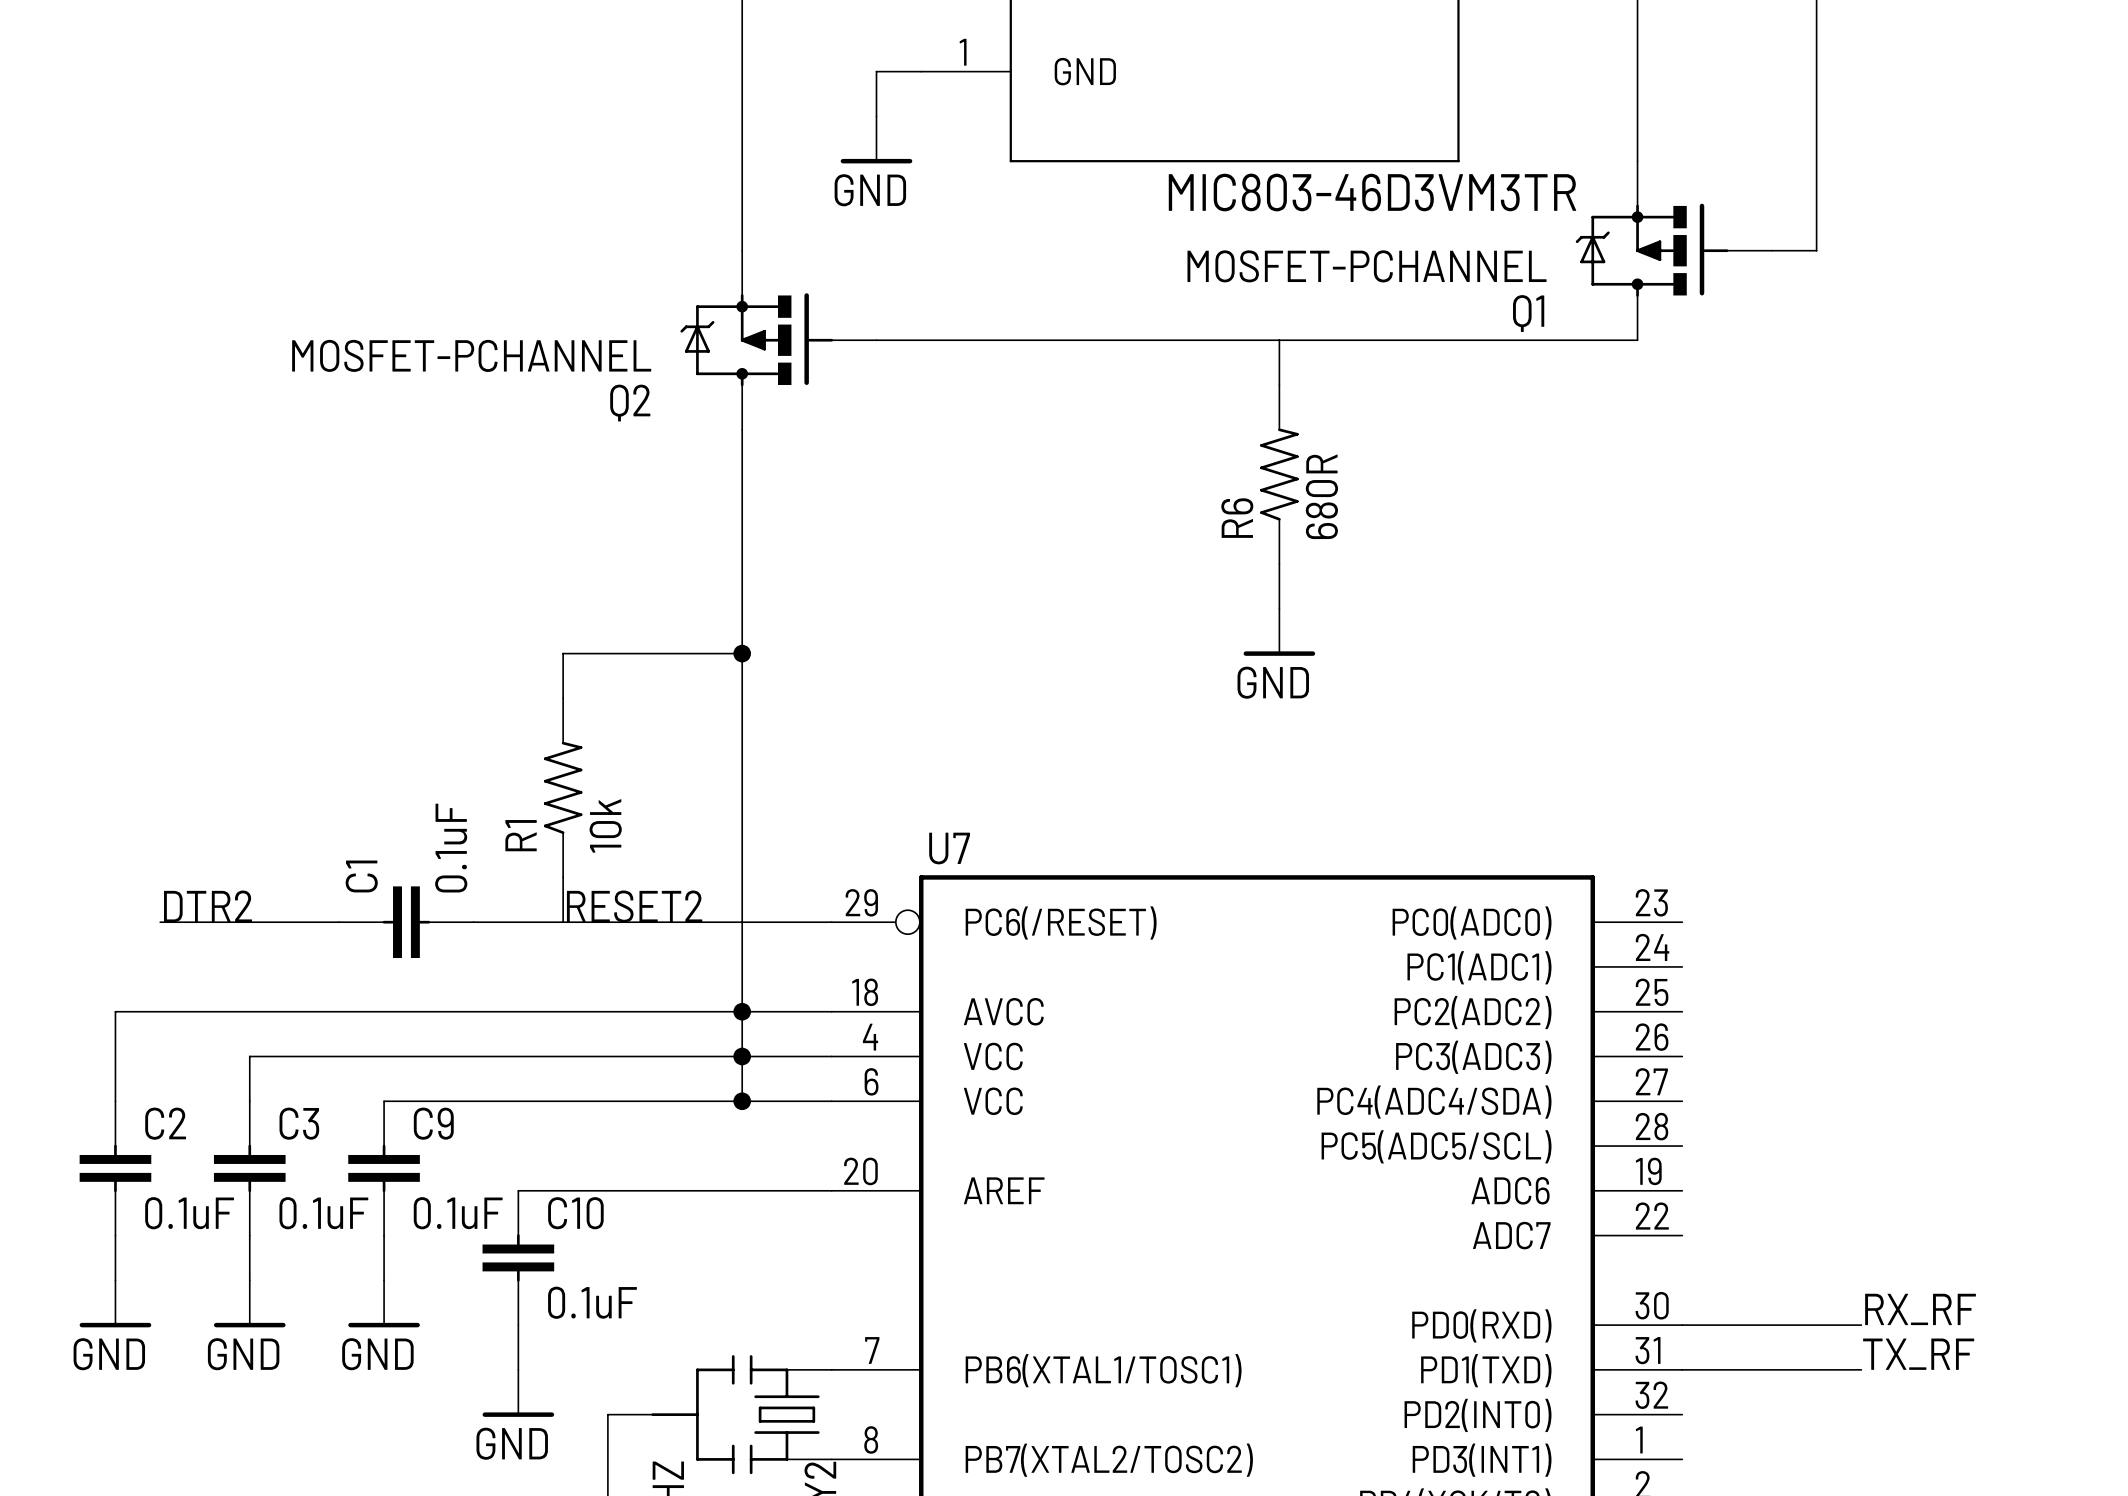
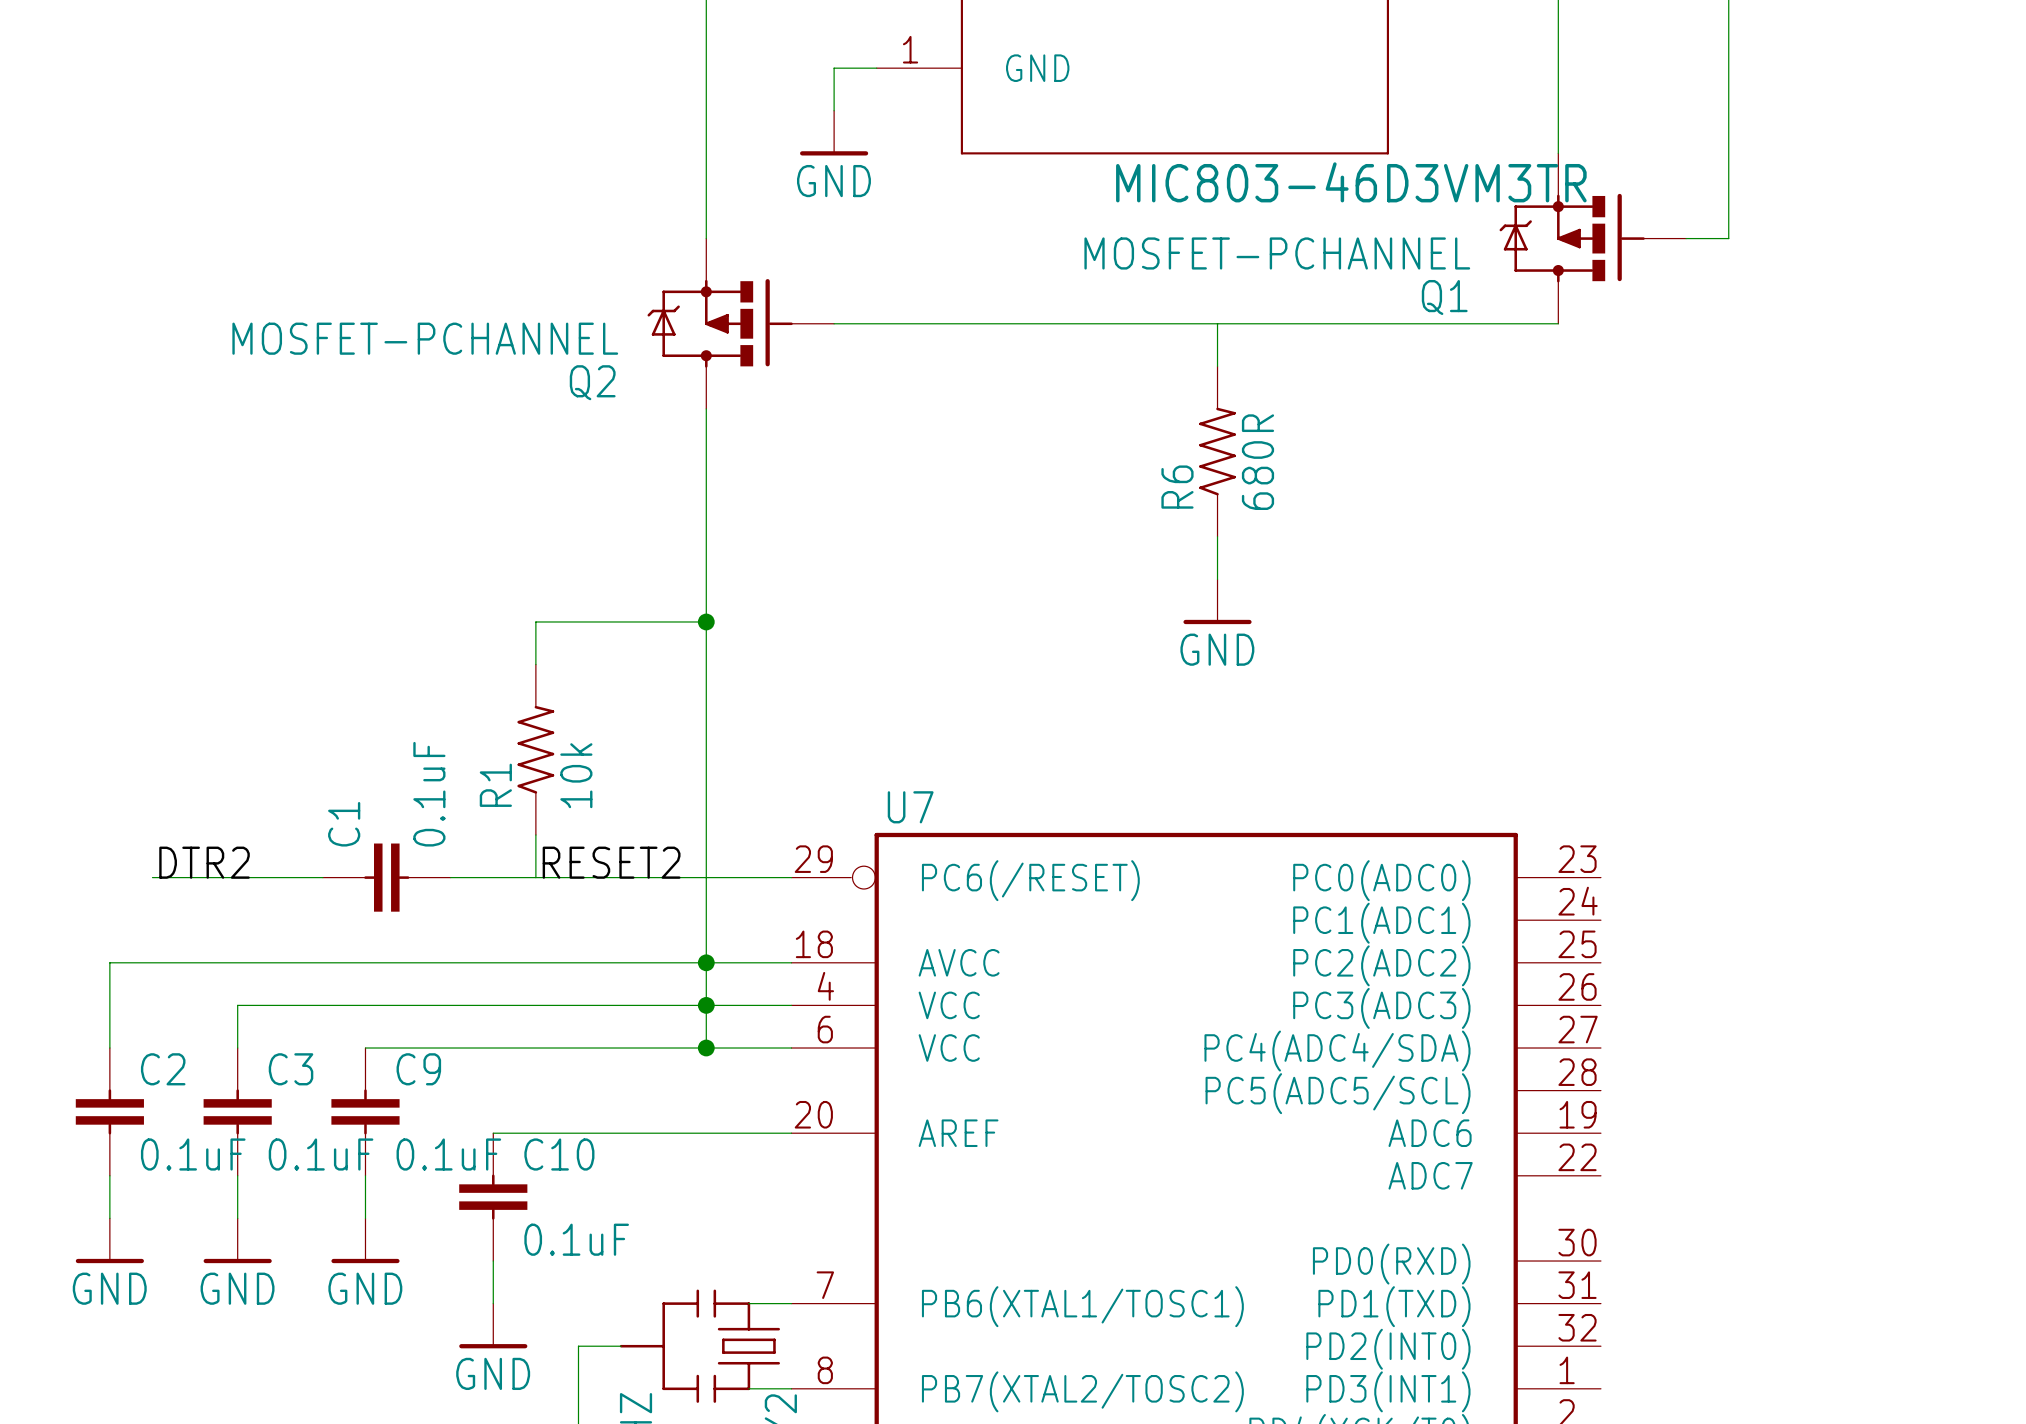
label: RX_RF (1920, 1309) -> none
wire: (1682, 1325) (1861, 1325) -> none
label: TX_RF (1918, 1354) -> none
wire: (1682, 1369) (1861, 1369) -> none

